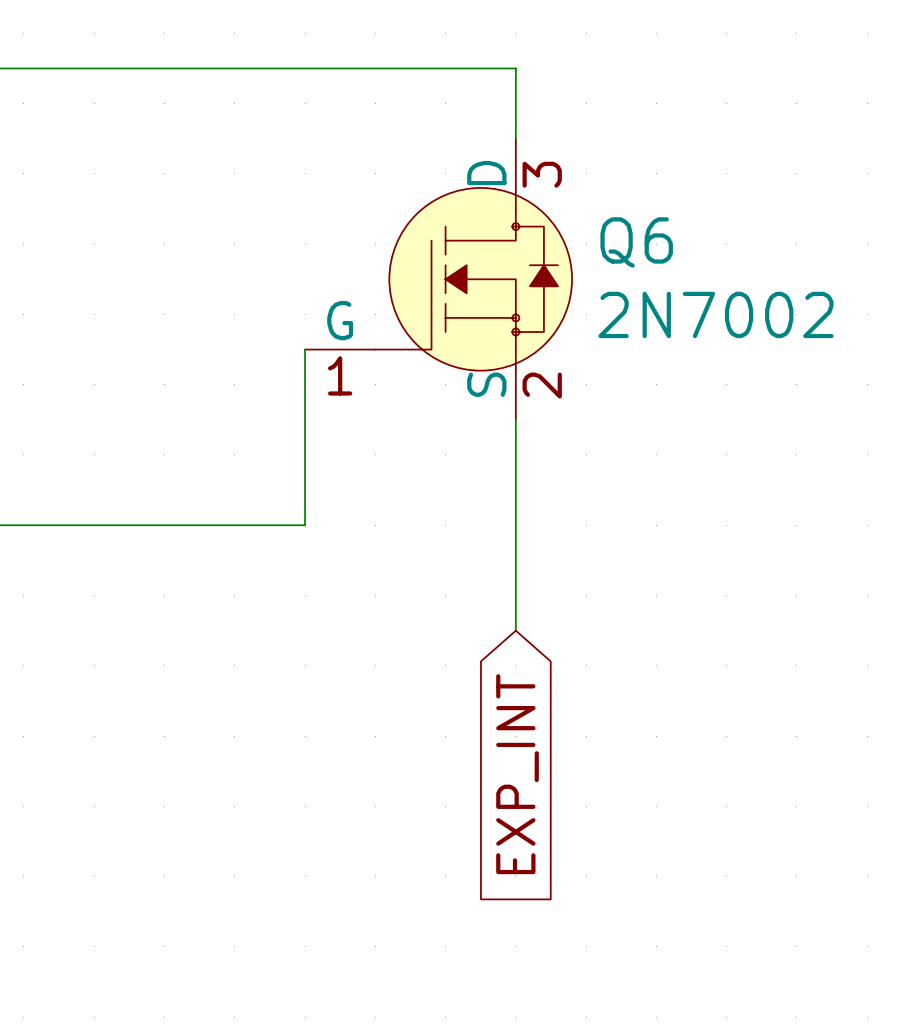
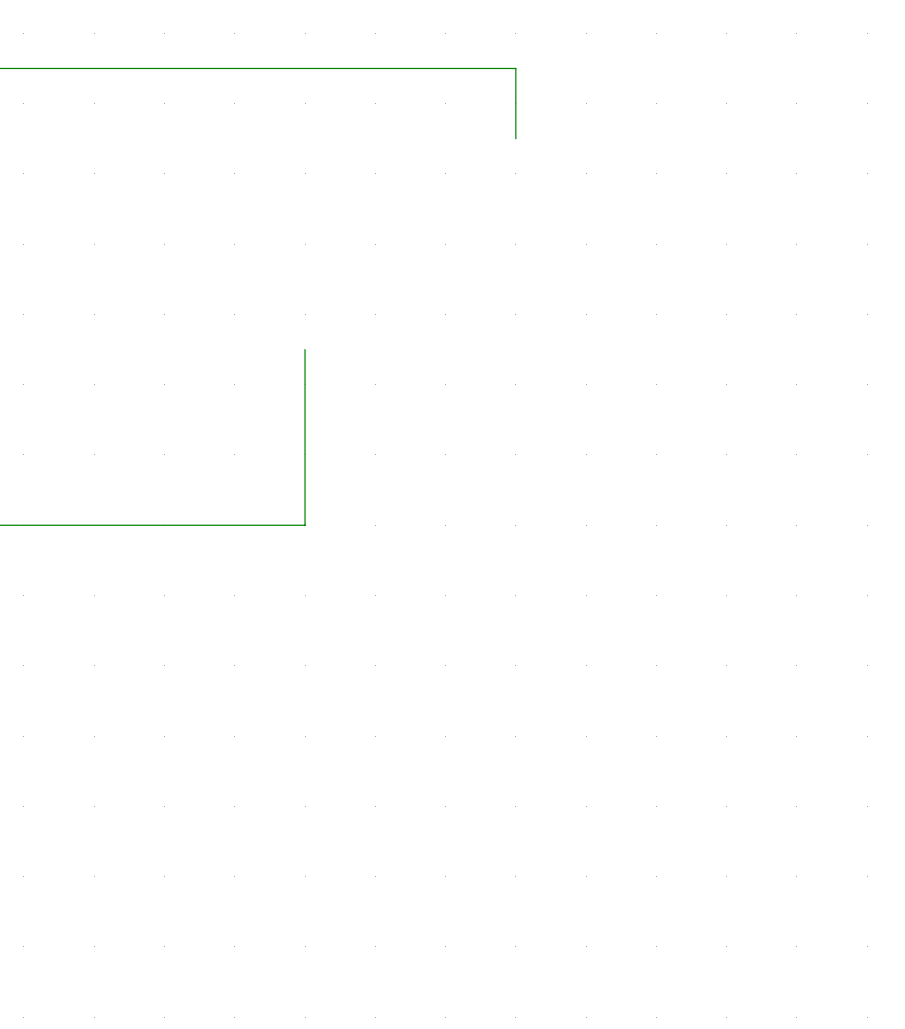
Q6: 2N7002 (438, 279) -> none
wire: (515, 419) (515, 630) -> none
global label: EXP_INT (517, 774) -> none

